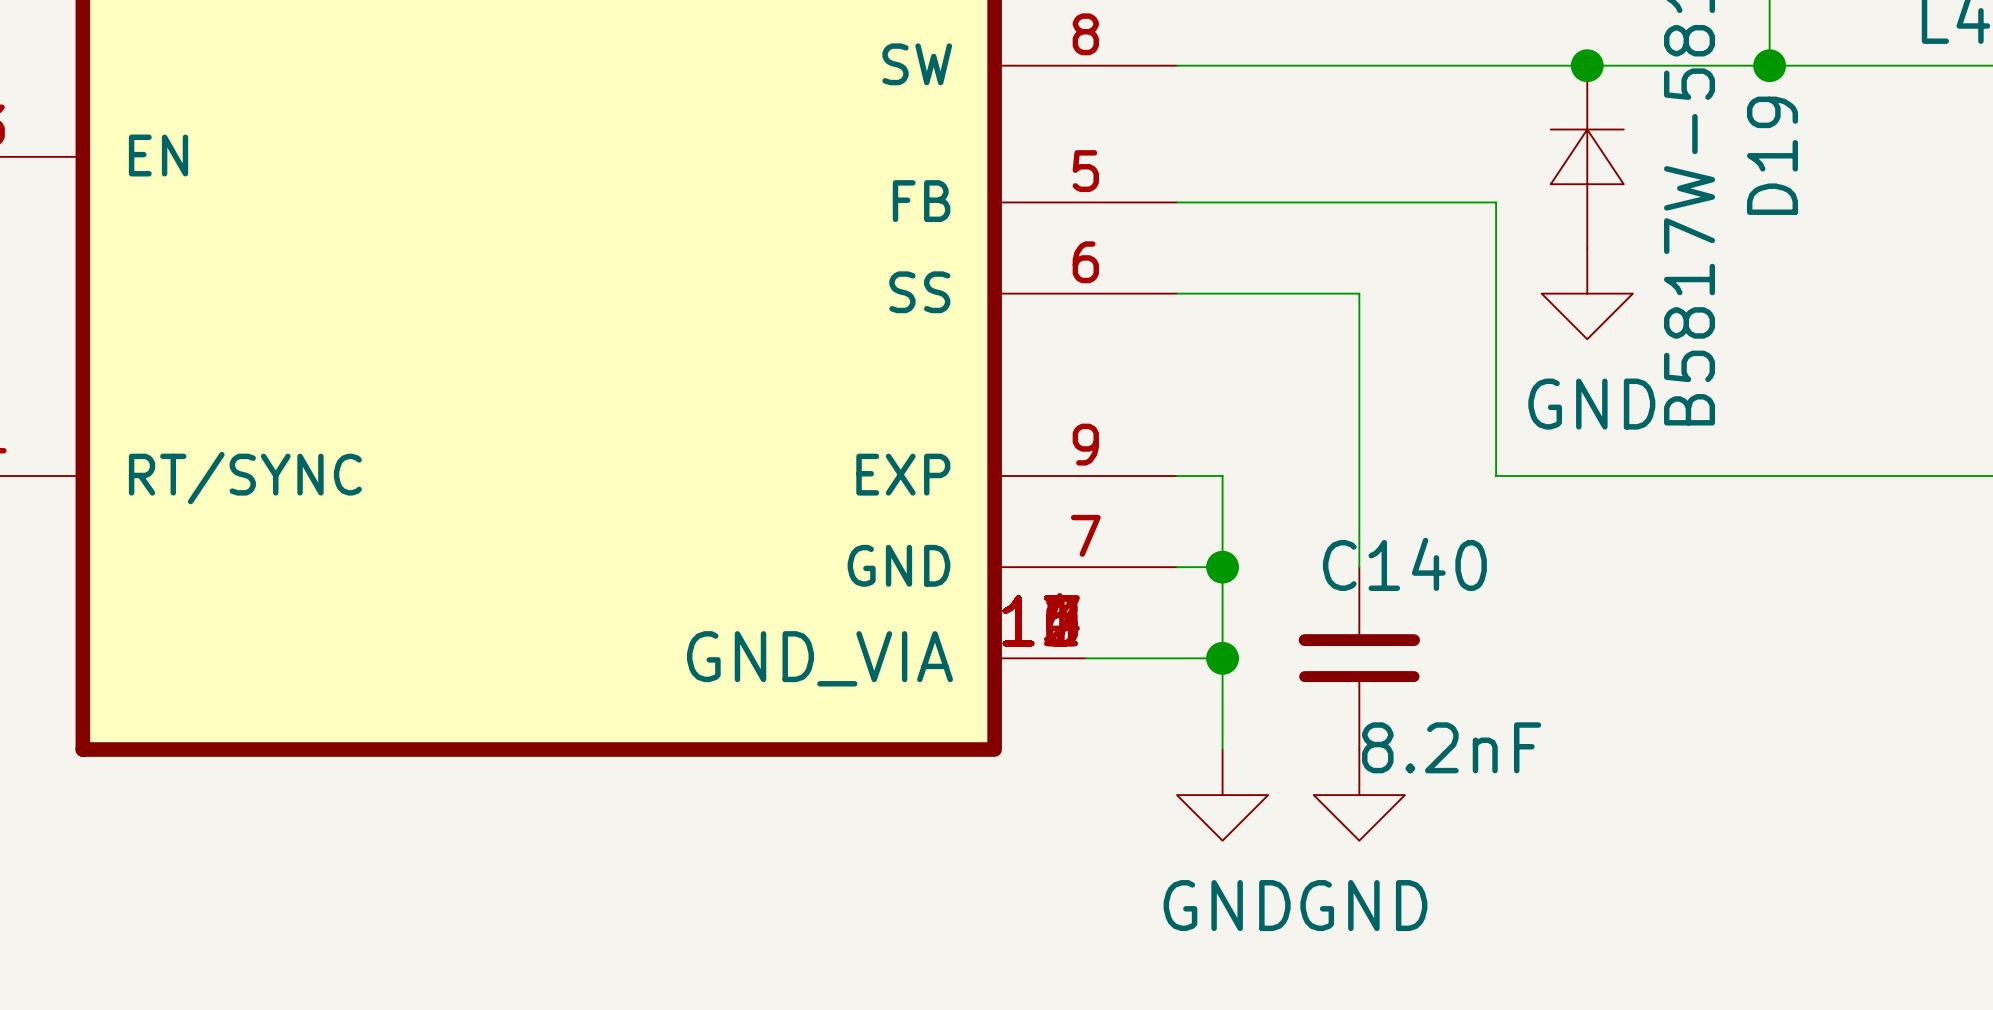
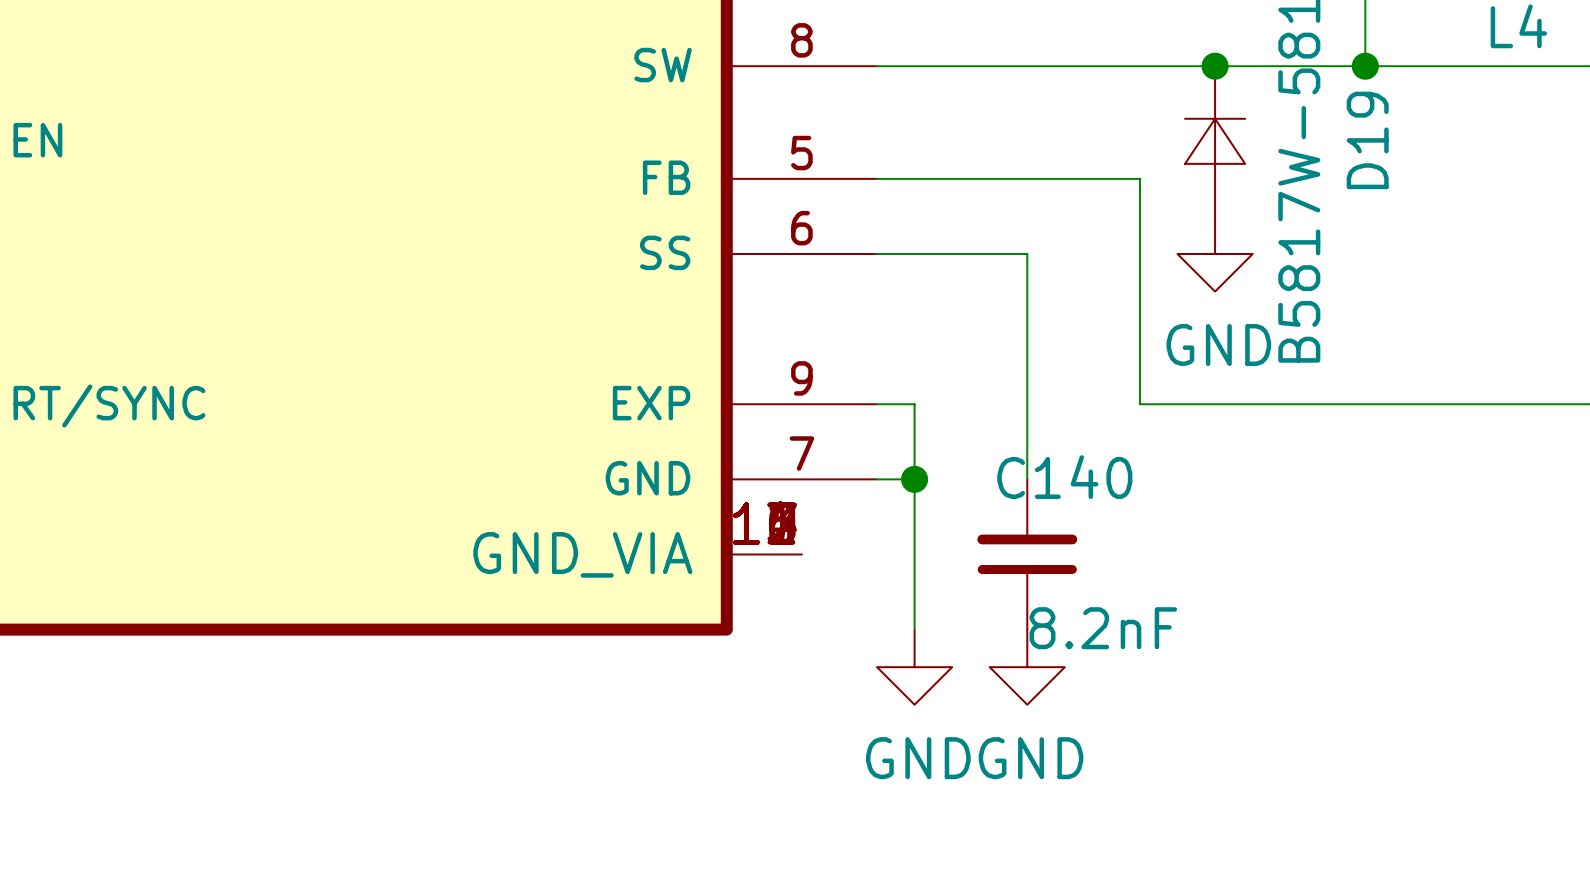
wire: (1085, 658) (1222, 658) -> none
junction: (1222, 658) -> none

